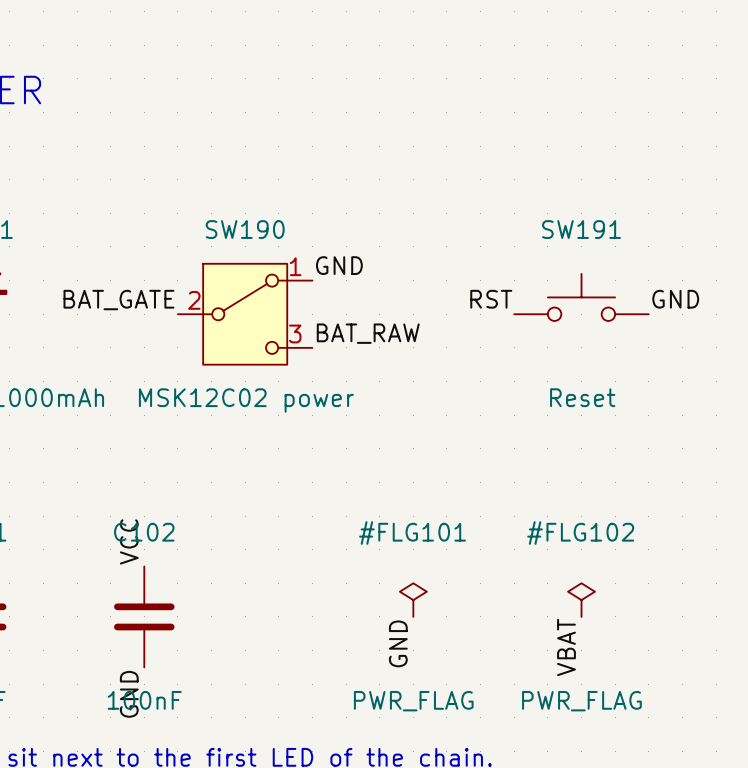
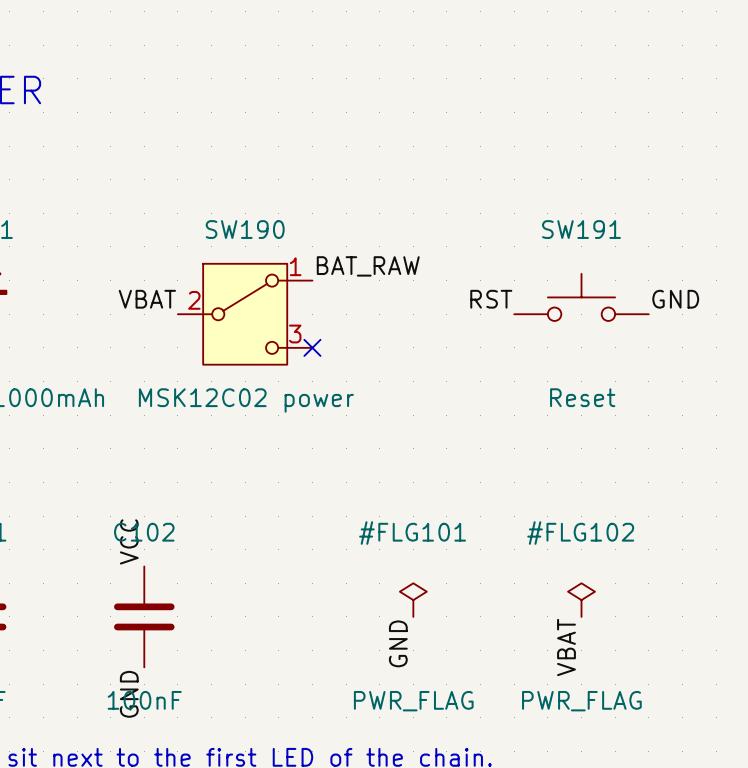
label: GND (339, 265) -> BAT_RAW (368, 266)
label: BAT_GATE (118, 300) -> VBAT (147, 299)
label: BAT_RAW (368, 333) -> none
no-connect mark: none -> (312, 347)

